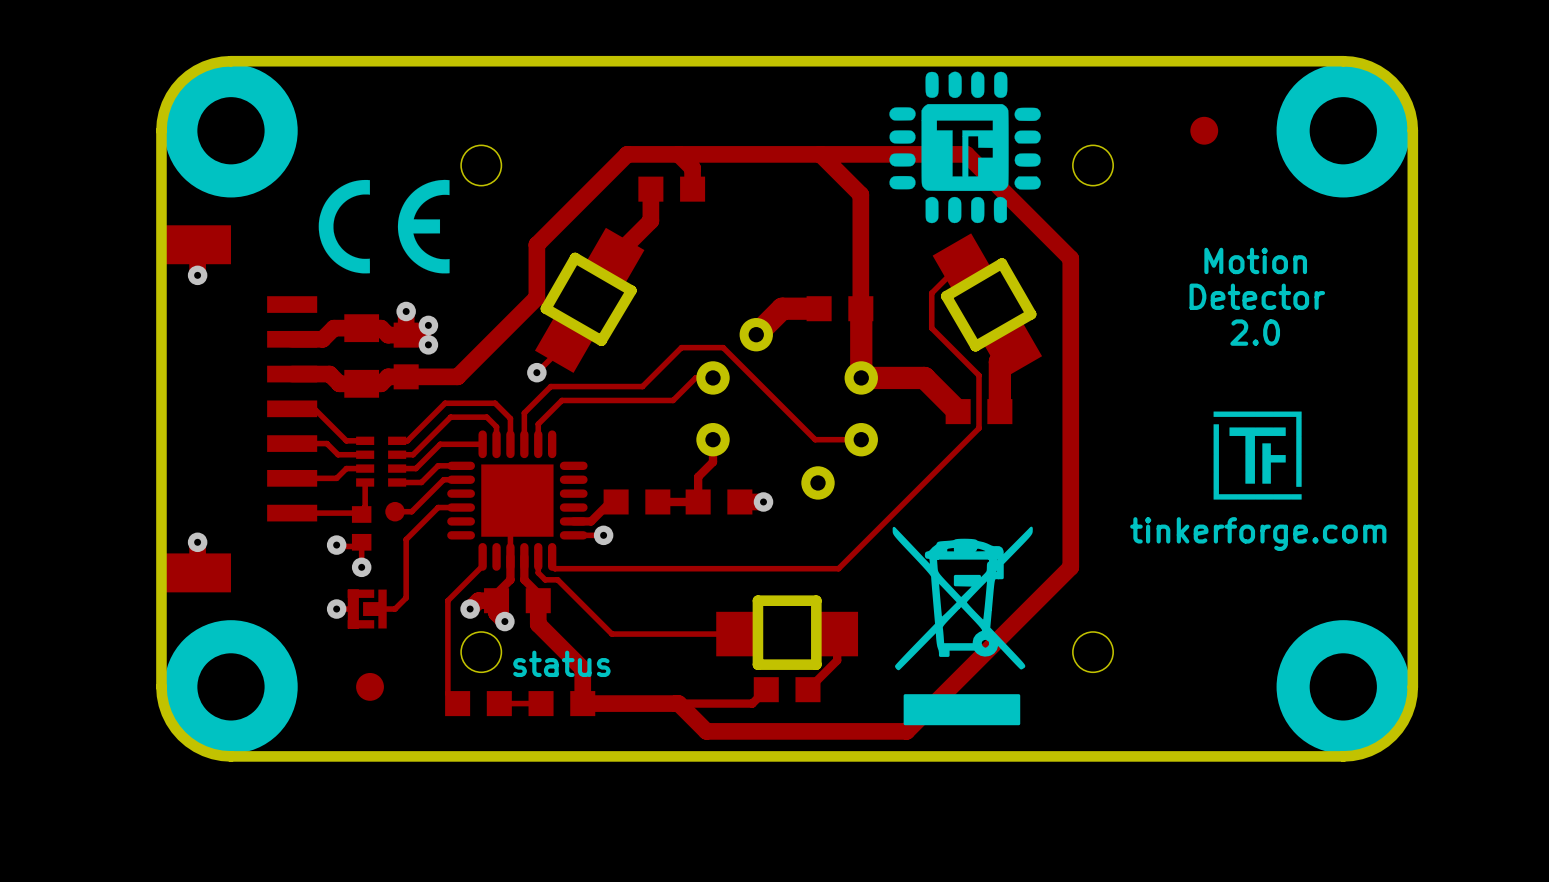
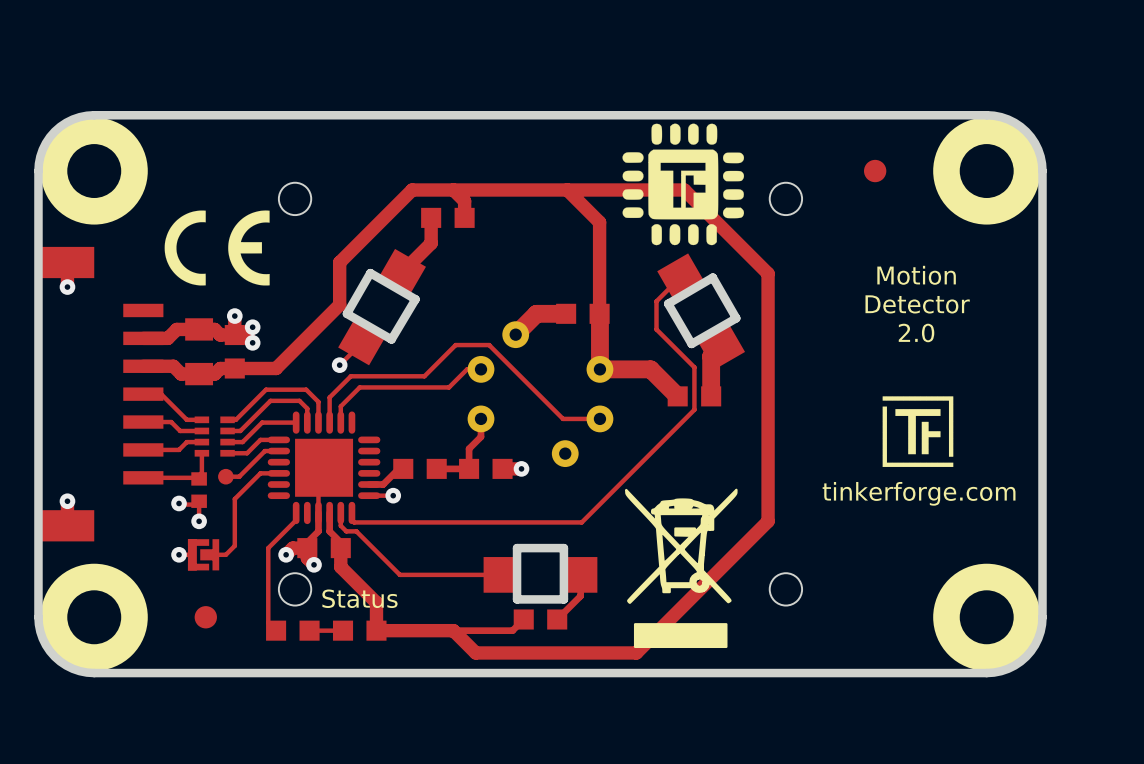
text: status (561, 663) -> Status (359, 598)

